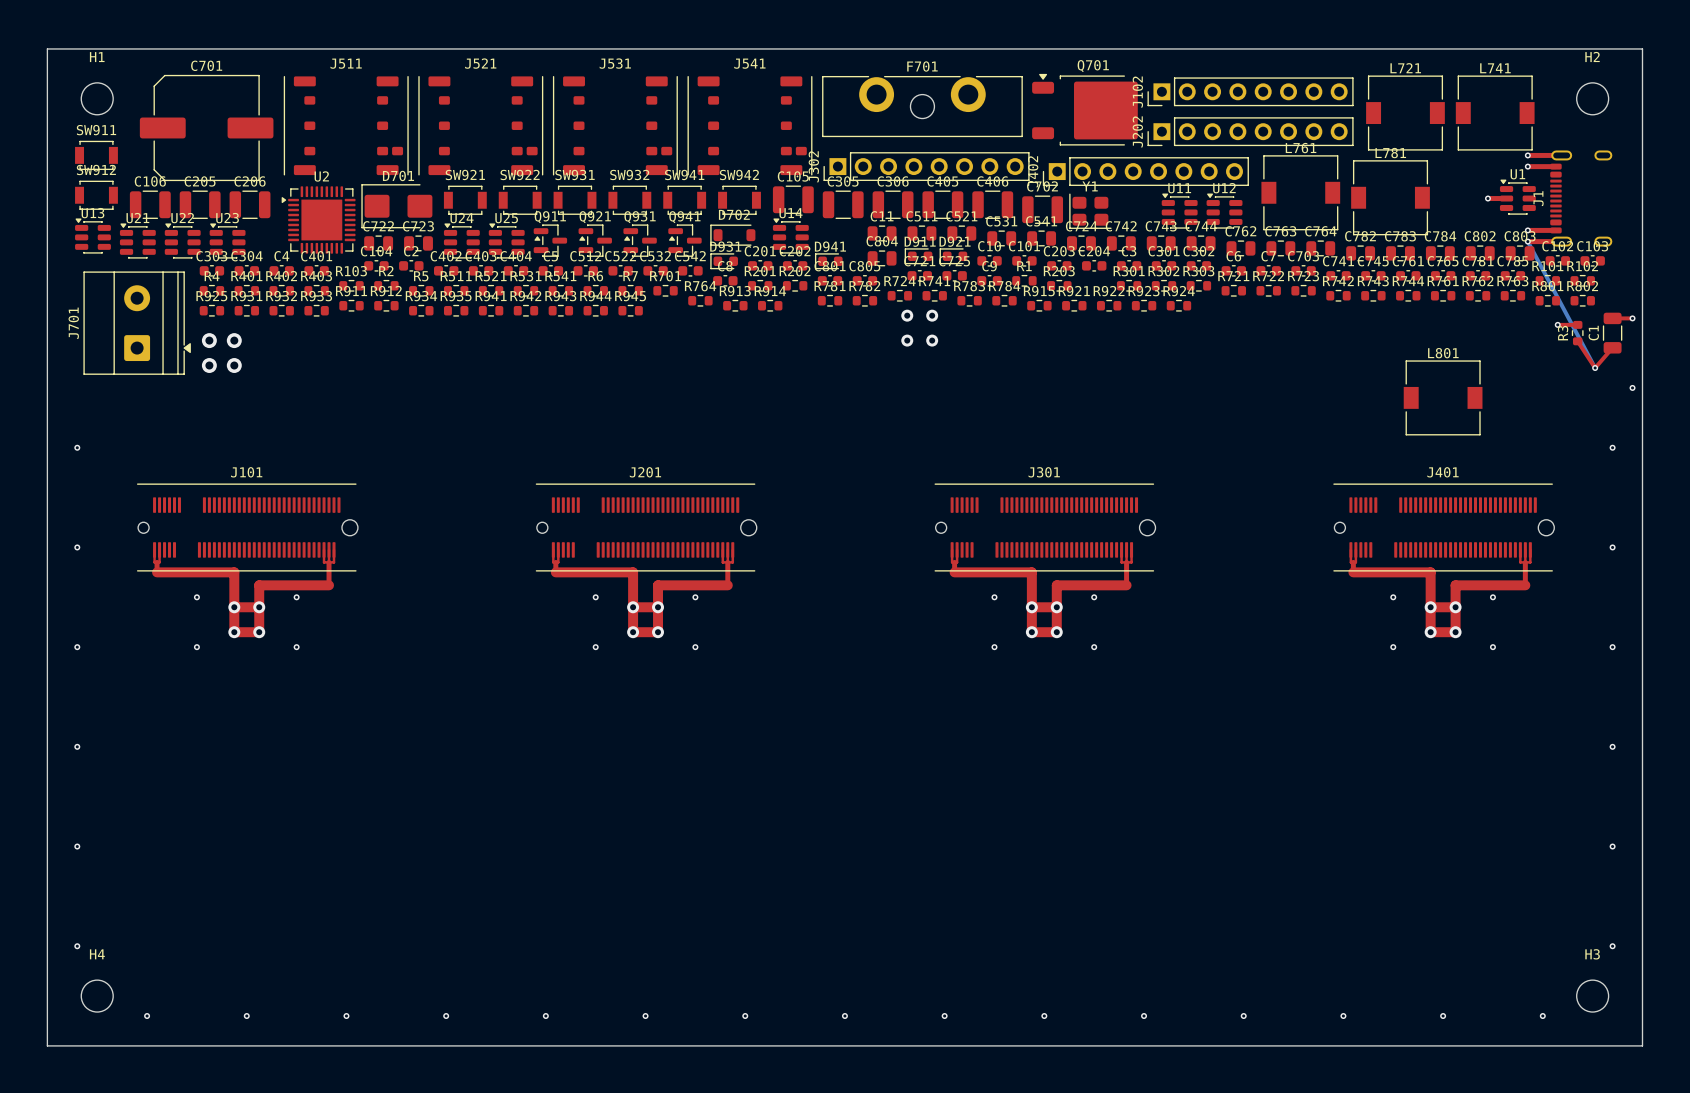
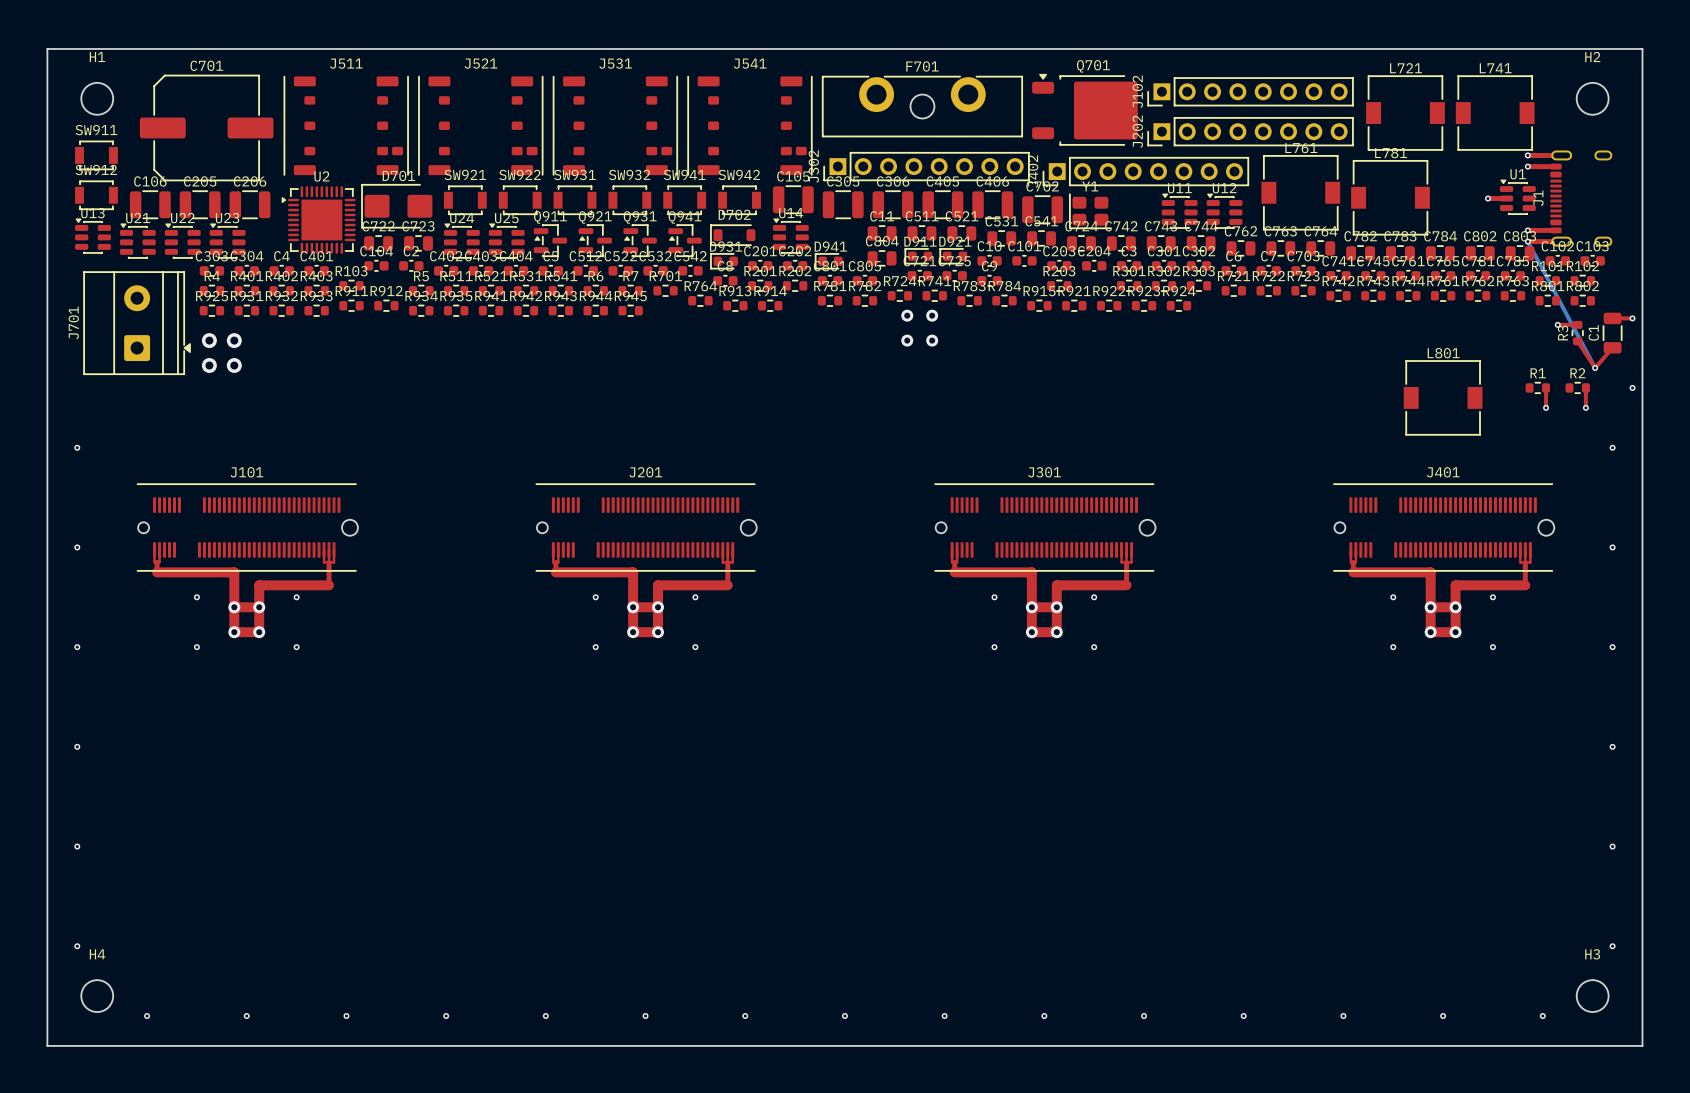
R1 position: (1024, 280) -> (1537, 387)
R2 position: (386, 285) -> (1577, 387)
top track: none -> (1546, 387) (1546, 407)
top track: none -> (1585, 387) (1585, 407)
via: none -> (1546, 407)
via: none -> (1585, 407)

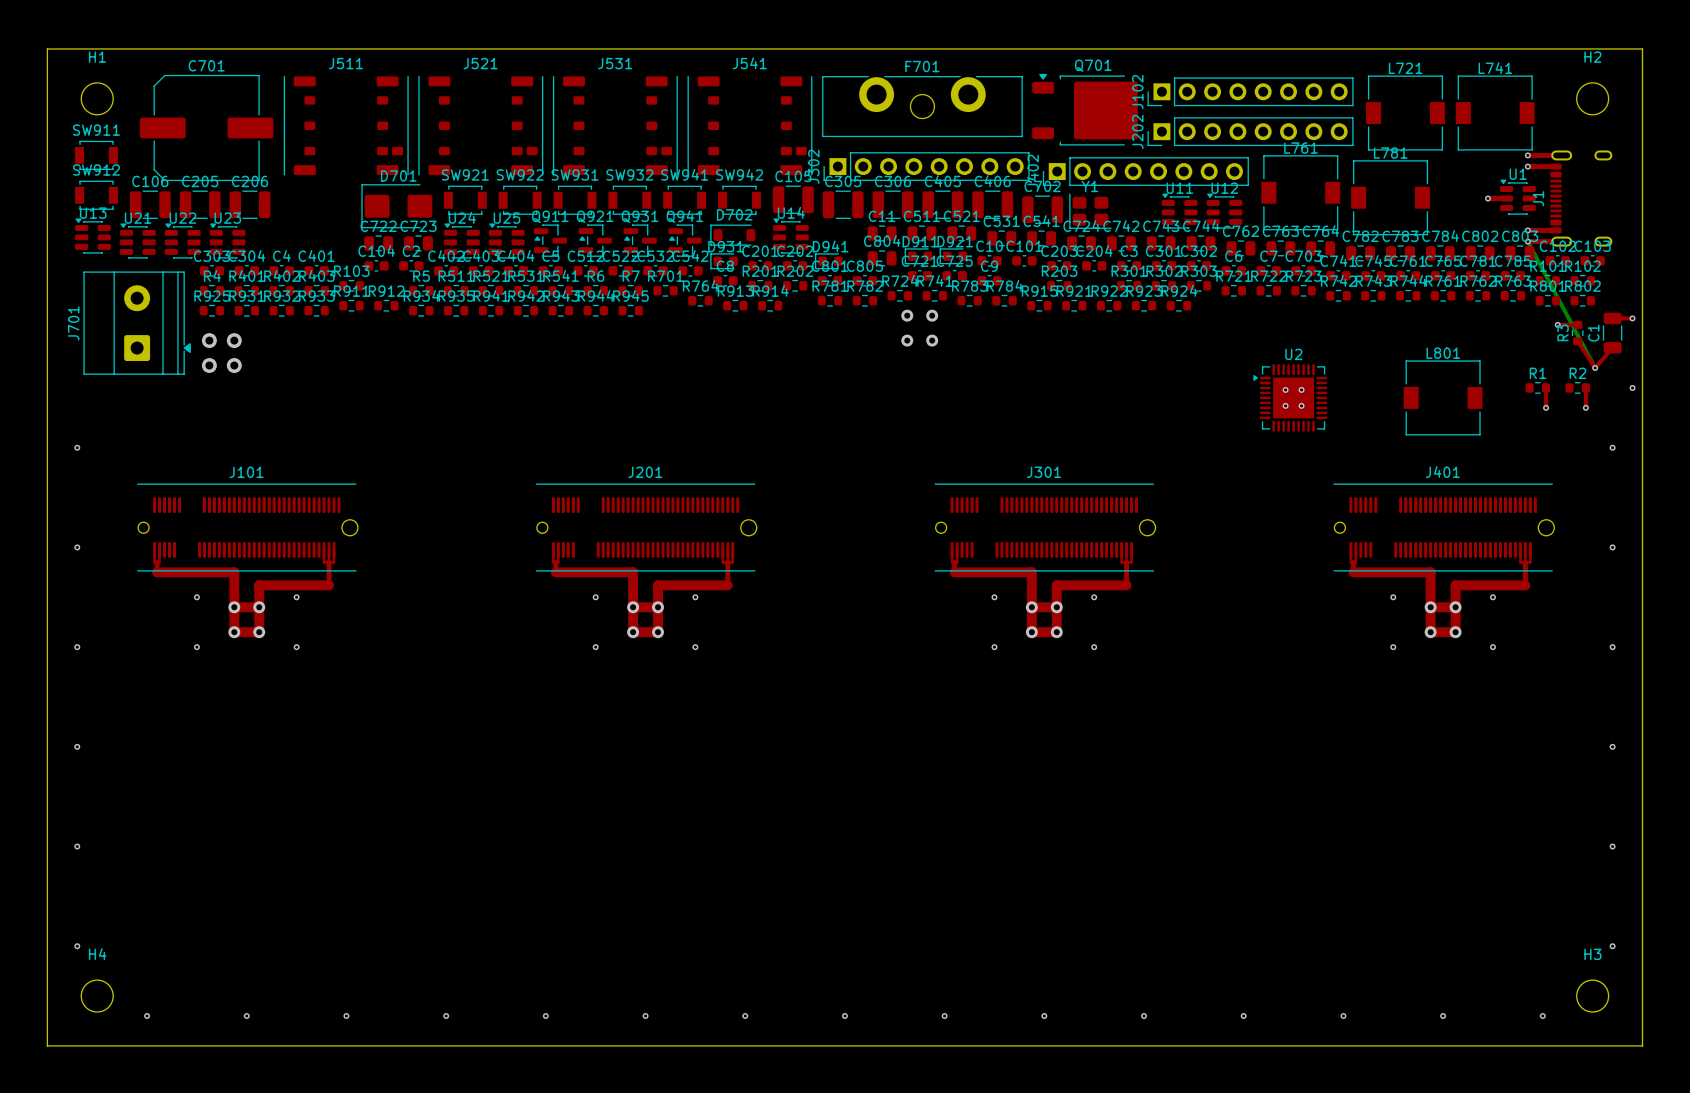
U2 position: (318, 220) -> (1290, 397)
via: none -> (1285, 389)
via: none -> (1301, 389)
via: none -> (1285, 405)
via: none -> (1301, 405)

